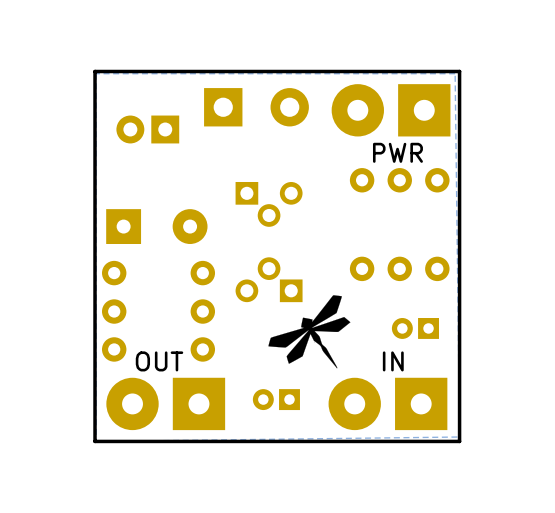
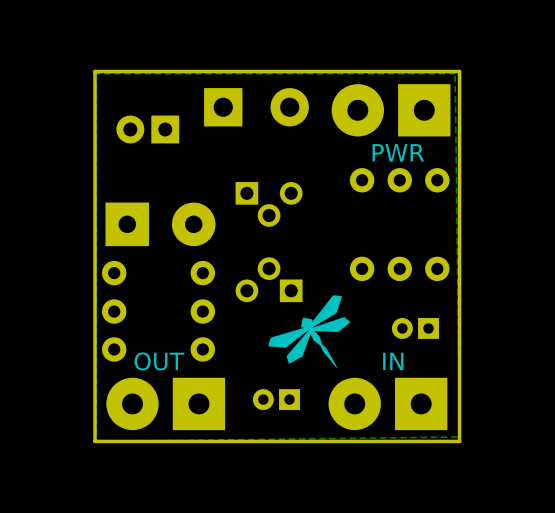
part footprint: [106, 209, 208, 244] -> [105, 202, 216, 247]

